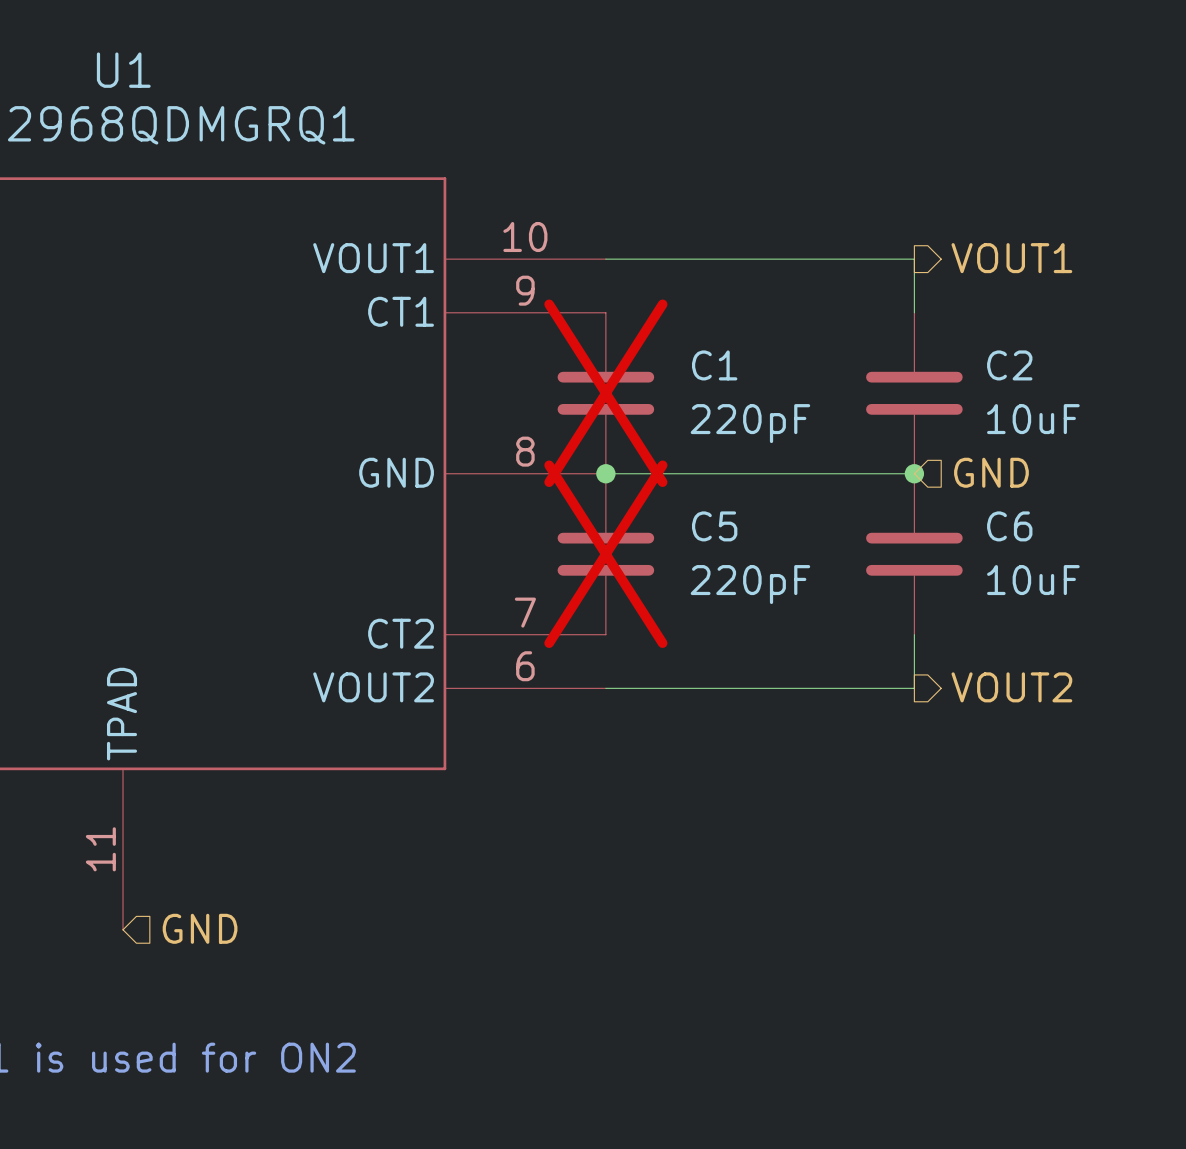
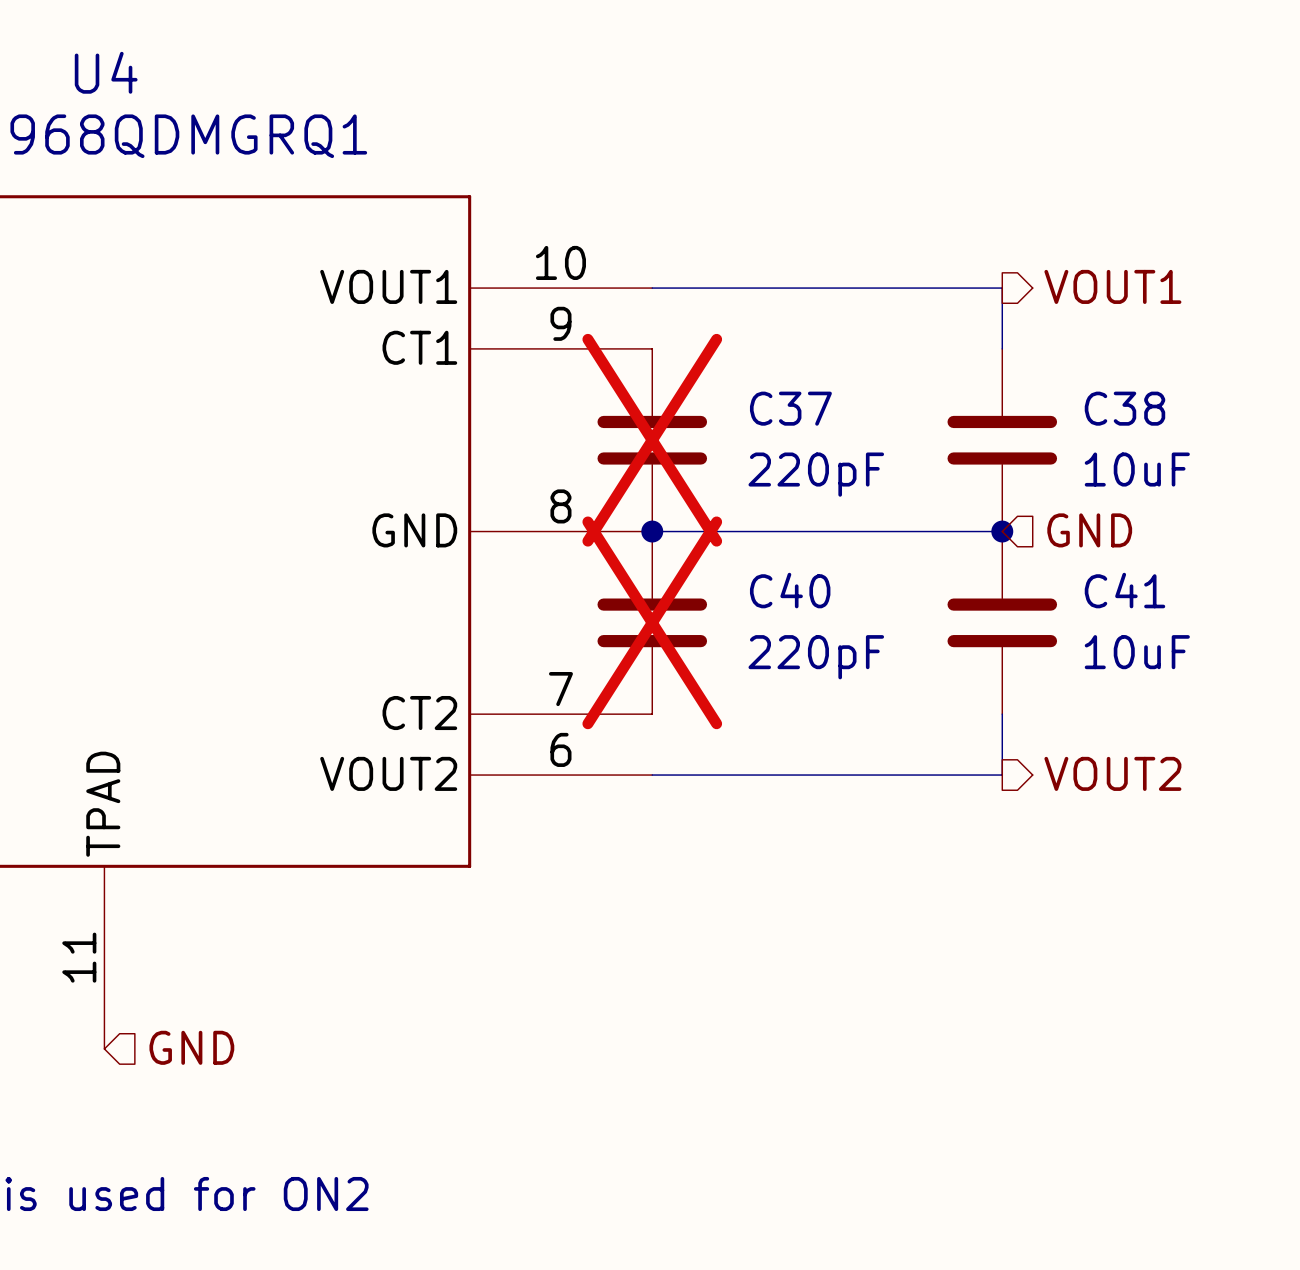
U1 name: U1 (123, 70) -> U4 (106, 72)
C1 name: C1 (714, 365) -> C37 (790, 408)
C2 name: C2 (1009, 365) -> C38 (1124, 408)
C5 name: C5 (714, 526) -> C40 (790, 590)
C6 name: C6 (1009, 526) -> C41 (1124, 590)

